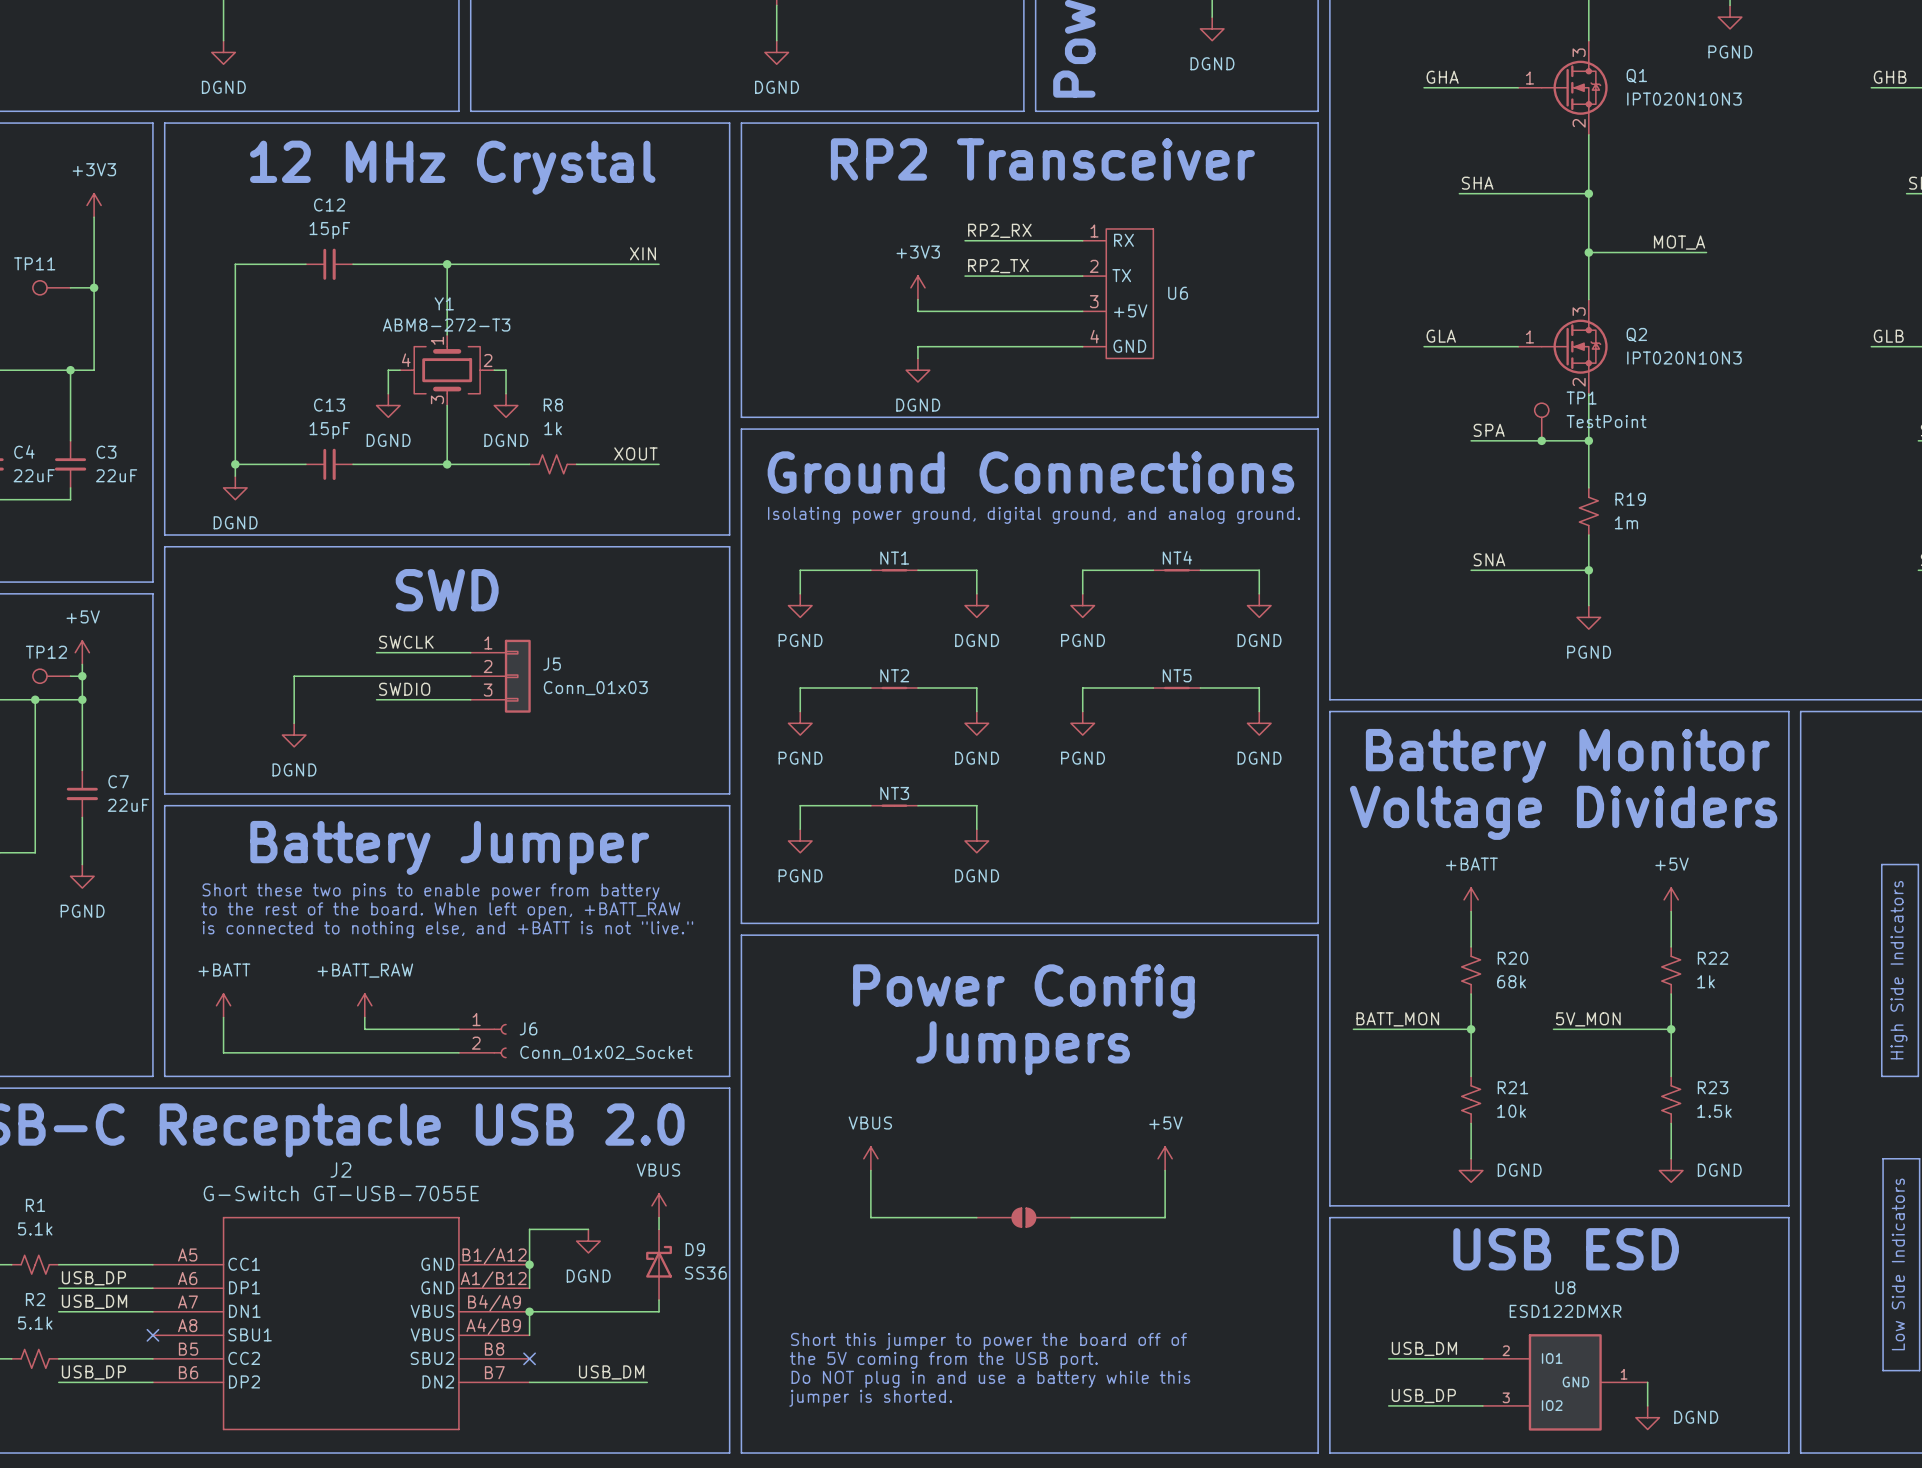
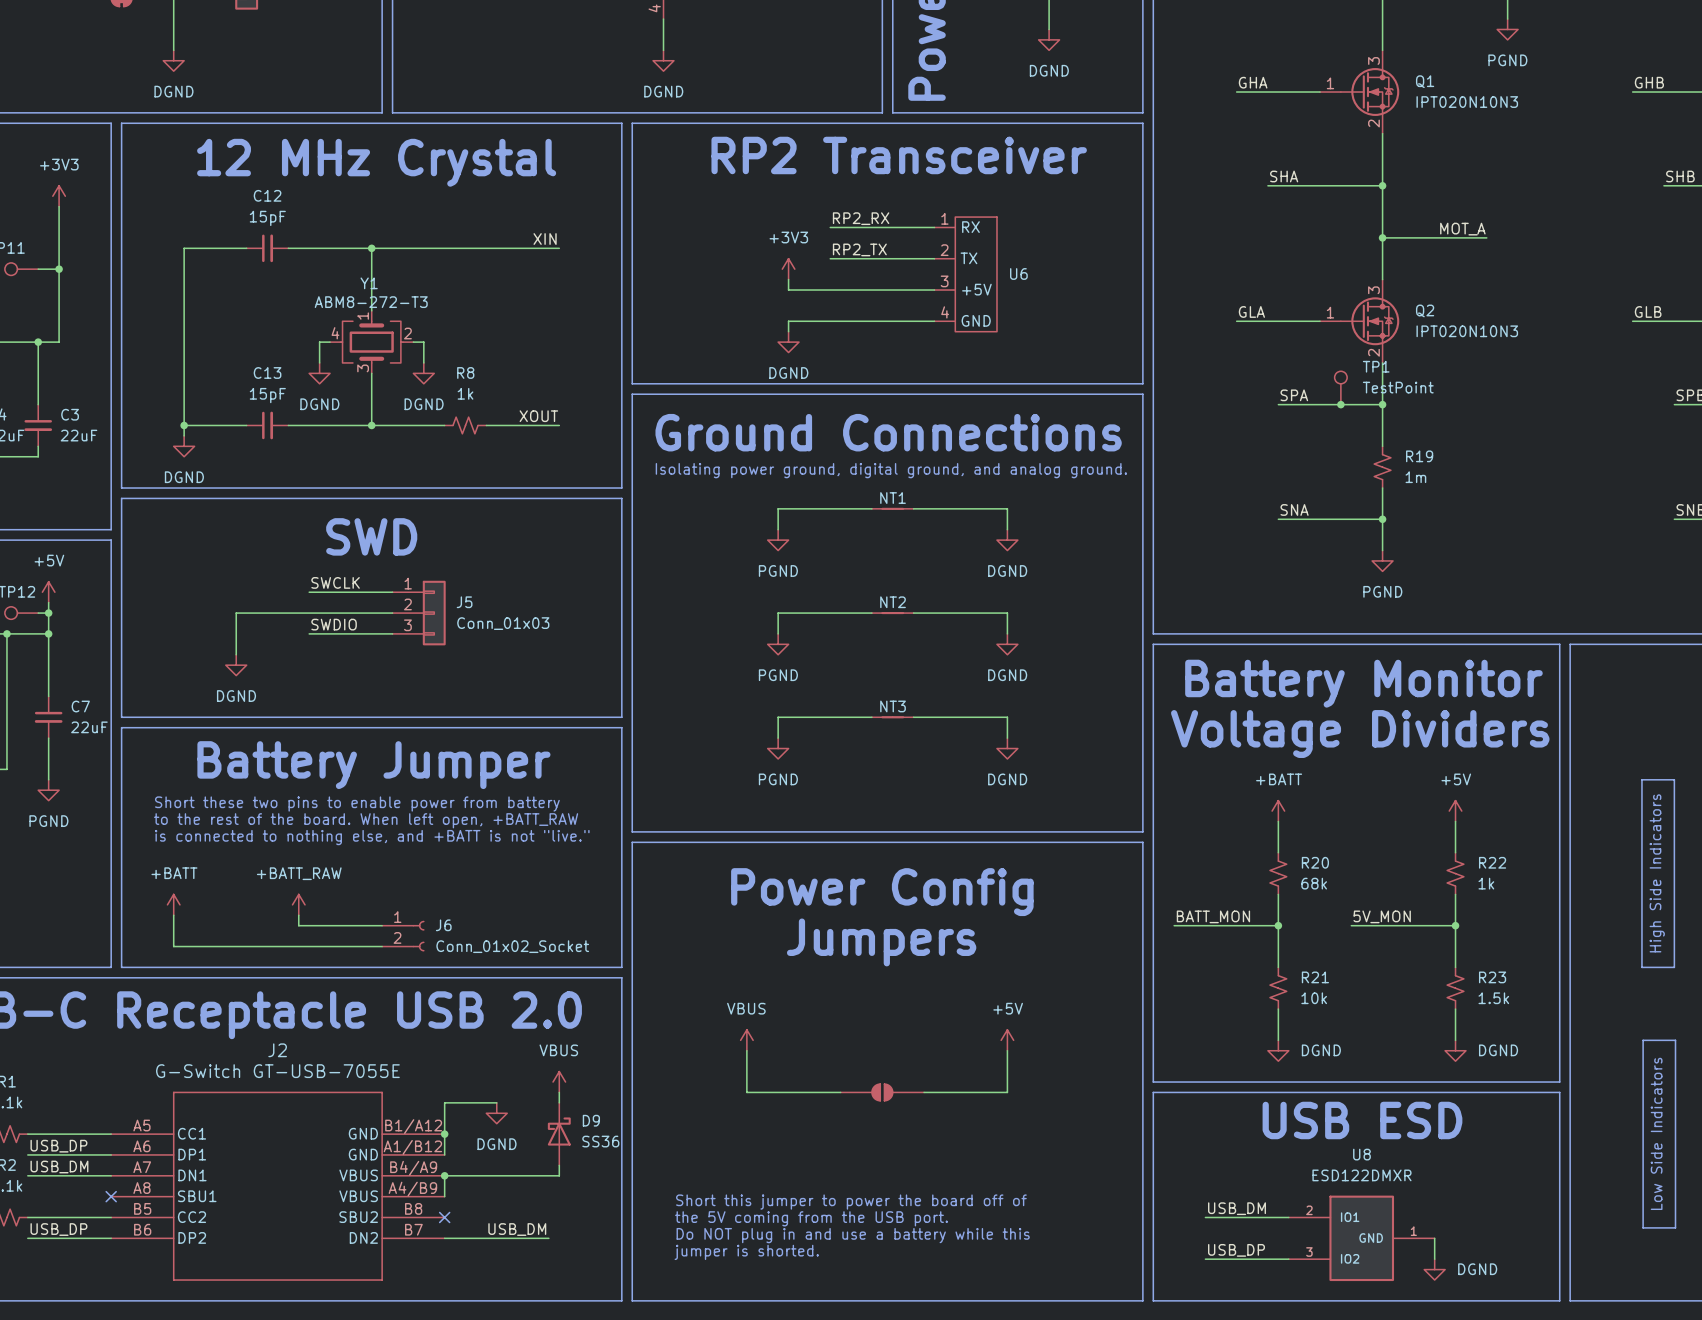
wire: none -> (871, 508) (778, 508) (778, 529)
wire: none -> (913, 508) (1007, 508) (1007, 529)
wire: (870, 570) (800, 570) (800, 593) -> none
NT1 position: (894, 570) -> (892, 508)
wire: (917, 570) (976, 570) (976, 593) -> none
wire: (1153, 570) (1082, 570) (1082, 593) -> none
NT4: (1176, 570) -> none
wire: (1200, 570) (1259, 570) (1259, 593) -> none
power symbol: none -> PGND (778, 540)
power symbol: none -> DGND (1007, 540)
power symbol: PGND (800, 605) -> none
power symbol: DGND (976, 605) -> none
power symbol: PGND (1082, 605) -> none
power symbol: DGND (1259, 605) -> none
wire: none -> (871, 613) (778, 613) (778, 633)
wire: none -> (913, 613) (1007, 613) (1007, 633)
wire: (870, 687) (800, 687) (800, 711) -> none
NT2 position: (894, 687) -> (892, 613)
wire: (917, 687) (976, 687) (976, 711) -> none
wire: (1153, 687) (1082, 687) (1082, 711) -> none
NT5: (1176, 687) -> none
wire: (1200, 687) (1259, 687) (1259, 711) -> none
power symbol: none -> PGND (778, 644)
power symbol: none -> DGND (1007, 644)
power symbol: PGND (800, 723) -> none
power symbol: DGND (976, 723) -> none
power symbol: PGND (1082, 723) -> none
power symbol: DGND (1259, 723) -> none
wire: none -> (871, 717) (778, 717) (778, 738)
wire: none -> (913, 717) (1007, 717) (1007, 738)
wire: (870, 805) (800, 805) (800, 829) -> none
NT3 position: (894, 805) -> (892, 717)
wire: (917, 805) (976, 805) (976, 829) -> none
power symbol: none -> PGND (778, 748)
power symbol: none -> DGND (1007, 748)
power symbol: PGND (800, 841) -> none
power symbol: DGND (976, 841) -> none

